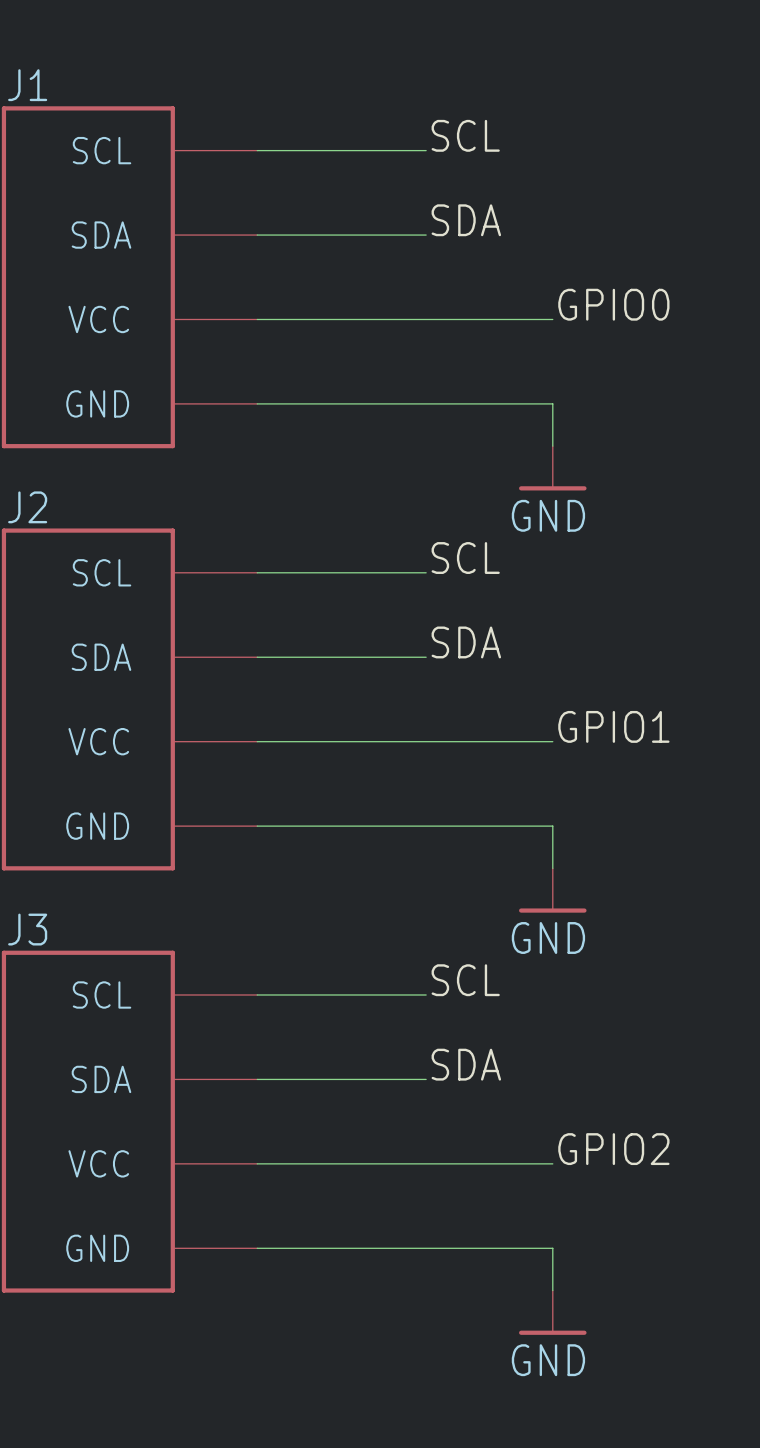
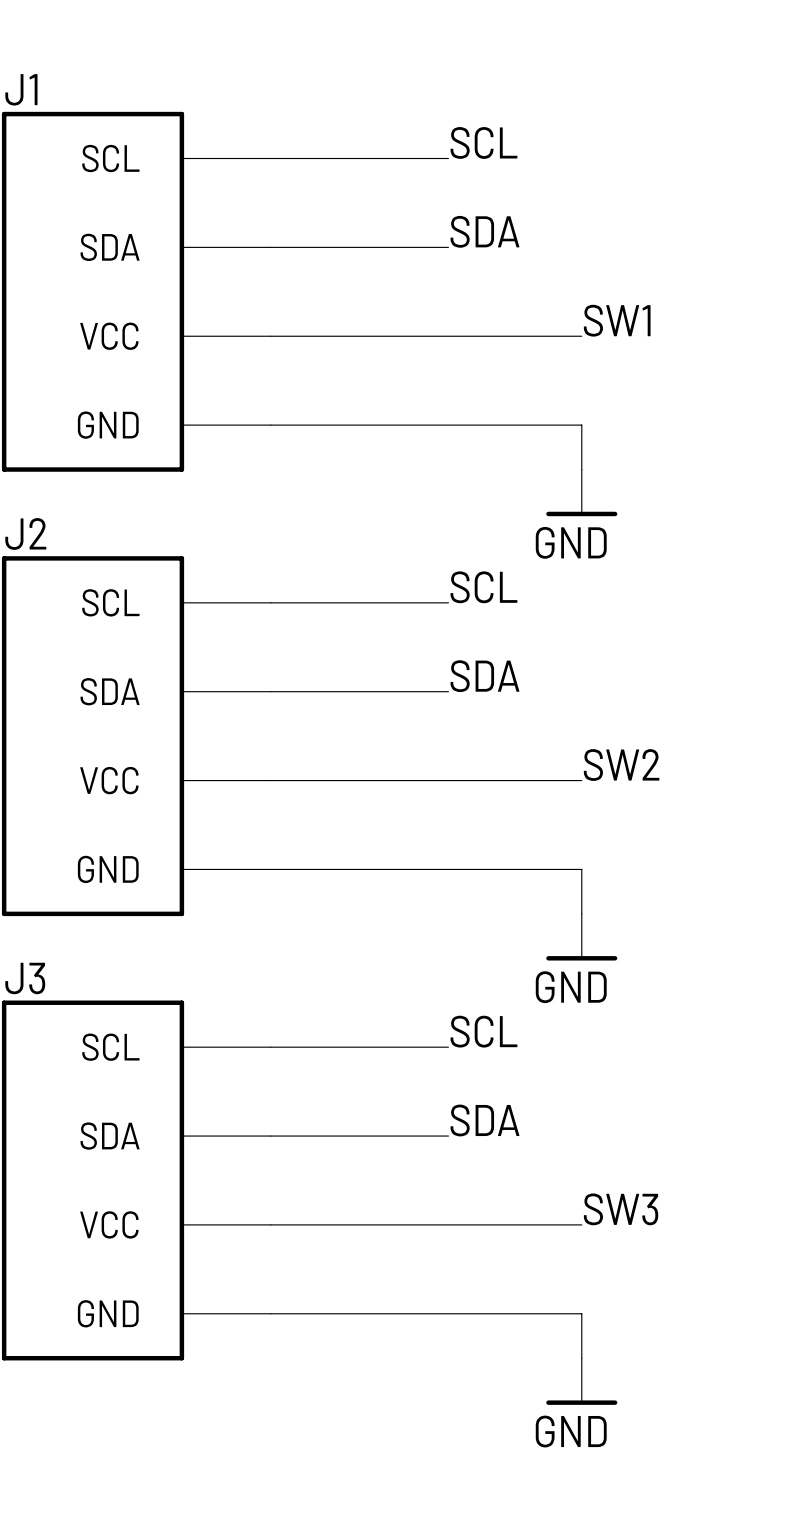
label: GPIO0 (613, 304) -> SW1 (617, 320)
label: GPIO1 (613, 726) -> SW2 (621, 765)
label: GPIO2 (613, 1149) -> SW3 (621, 1209)

